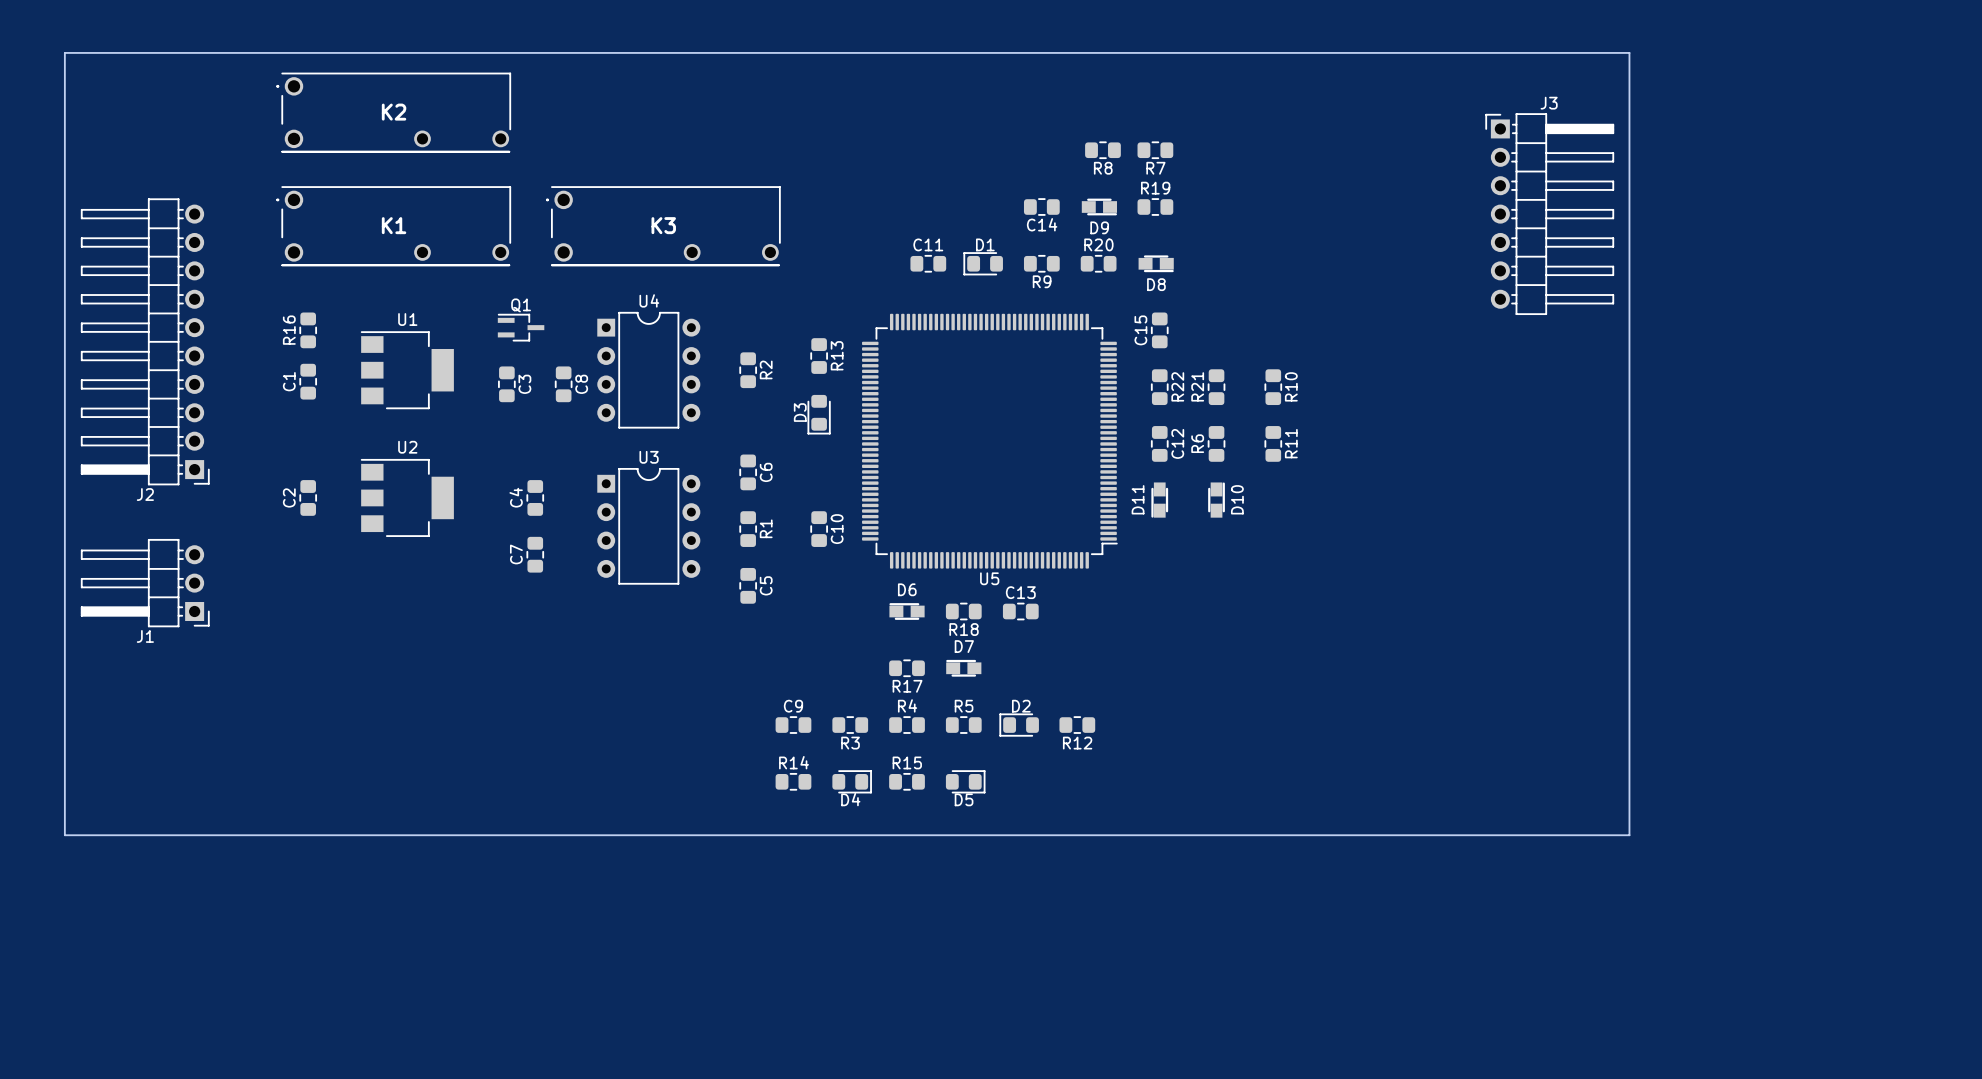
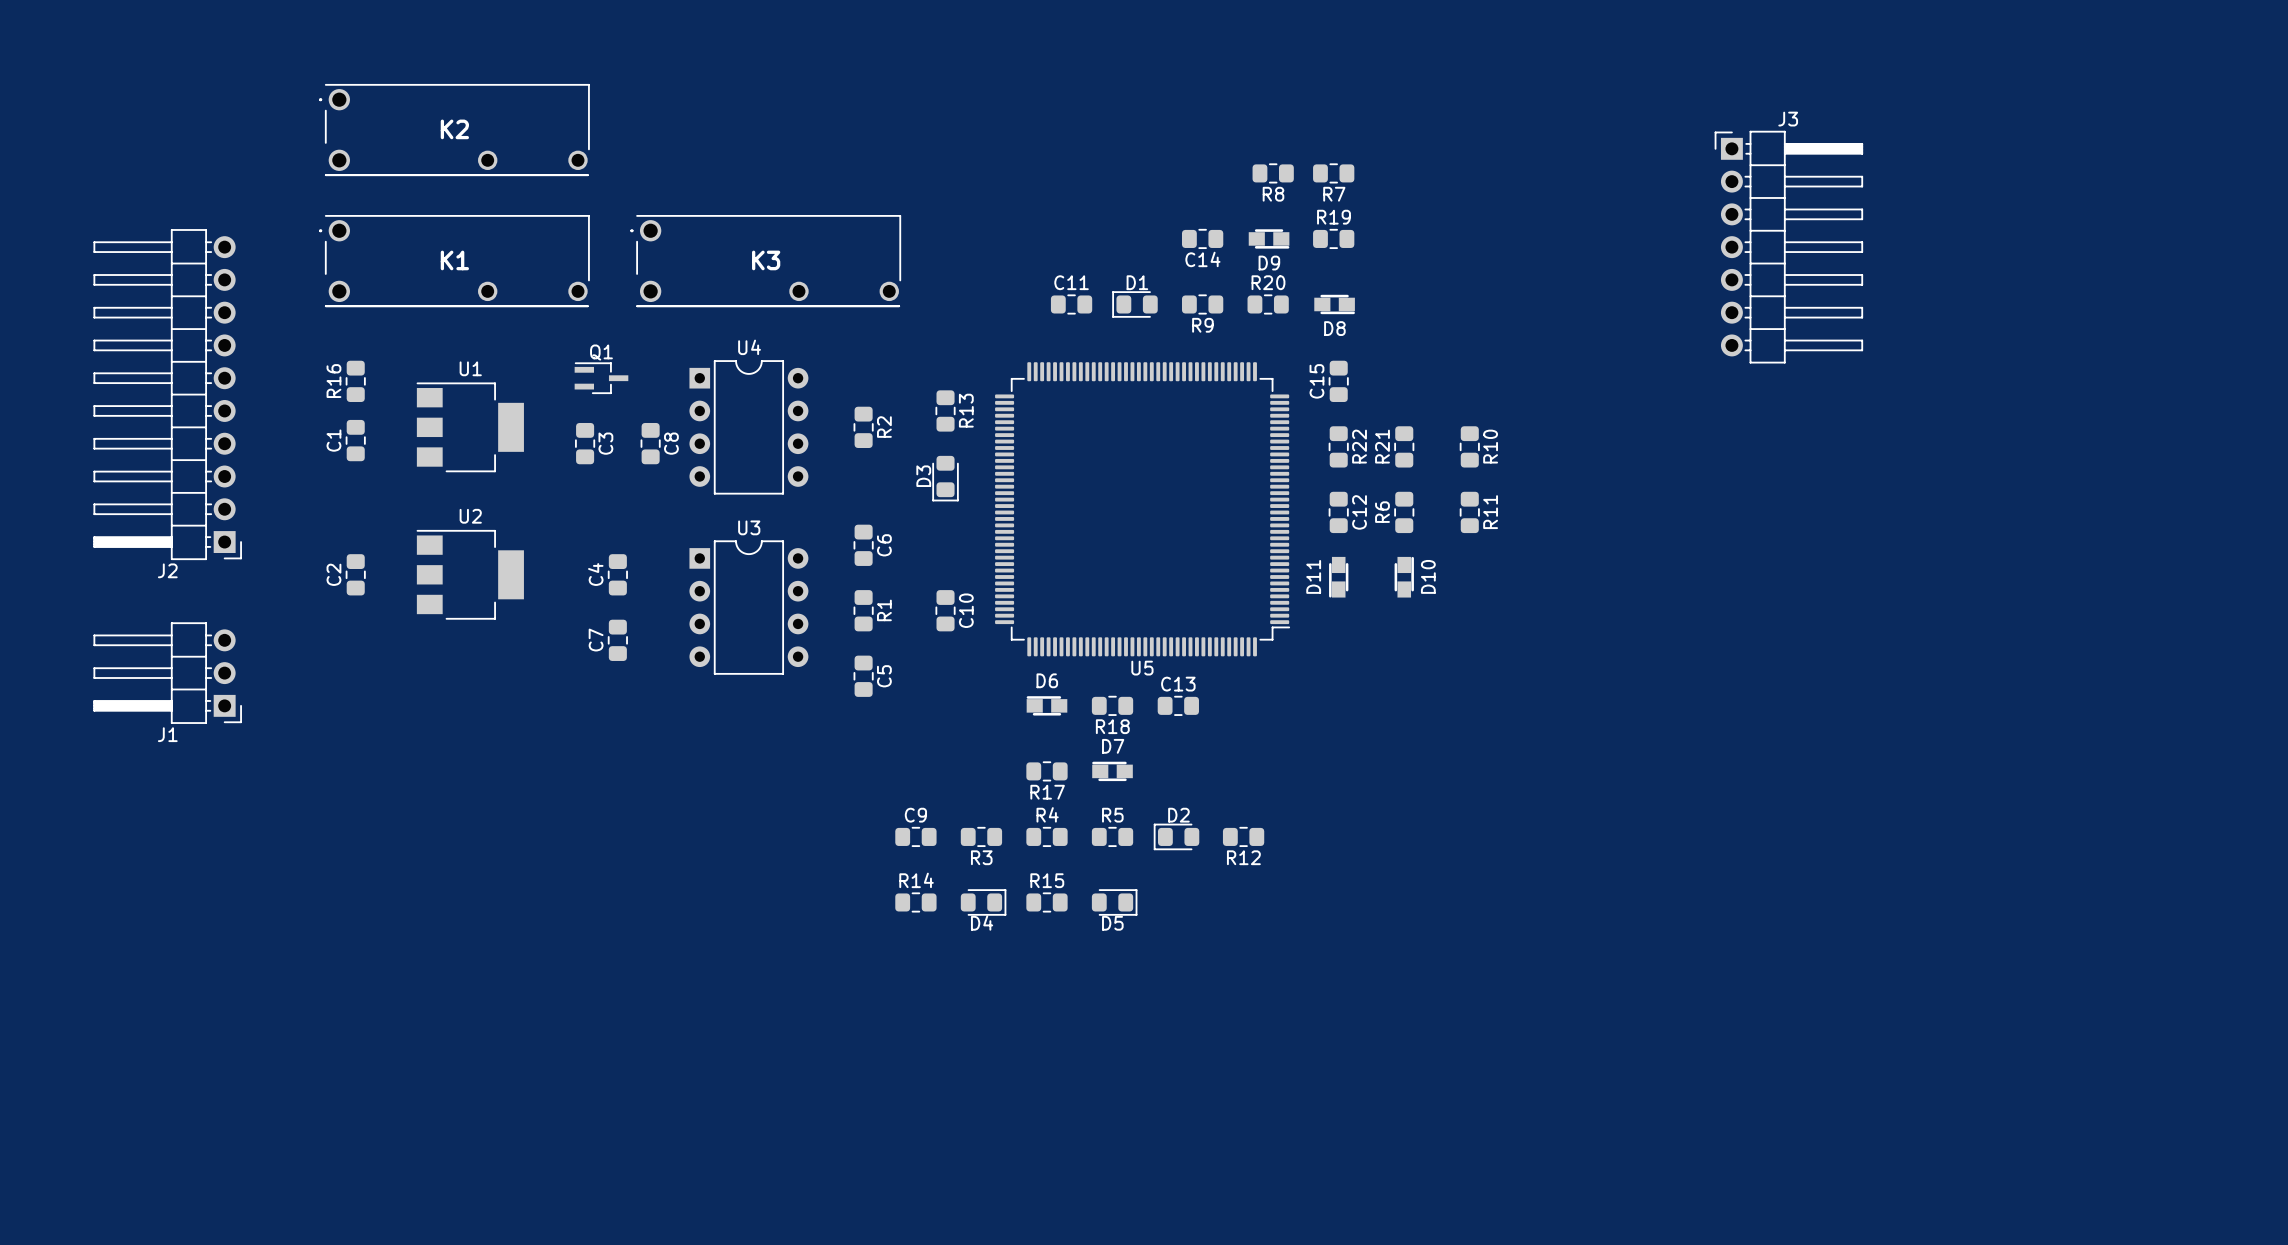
board edge: (64, 52) (1629, 52) (1629, 835) (64, 835) (64, 52) -> none

